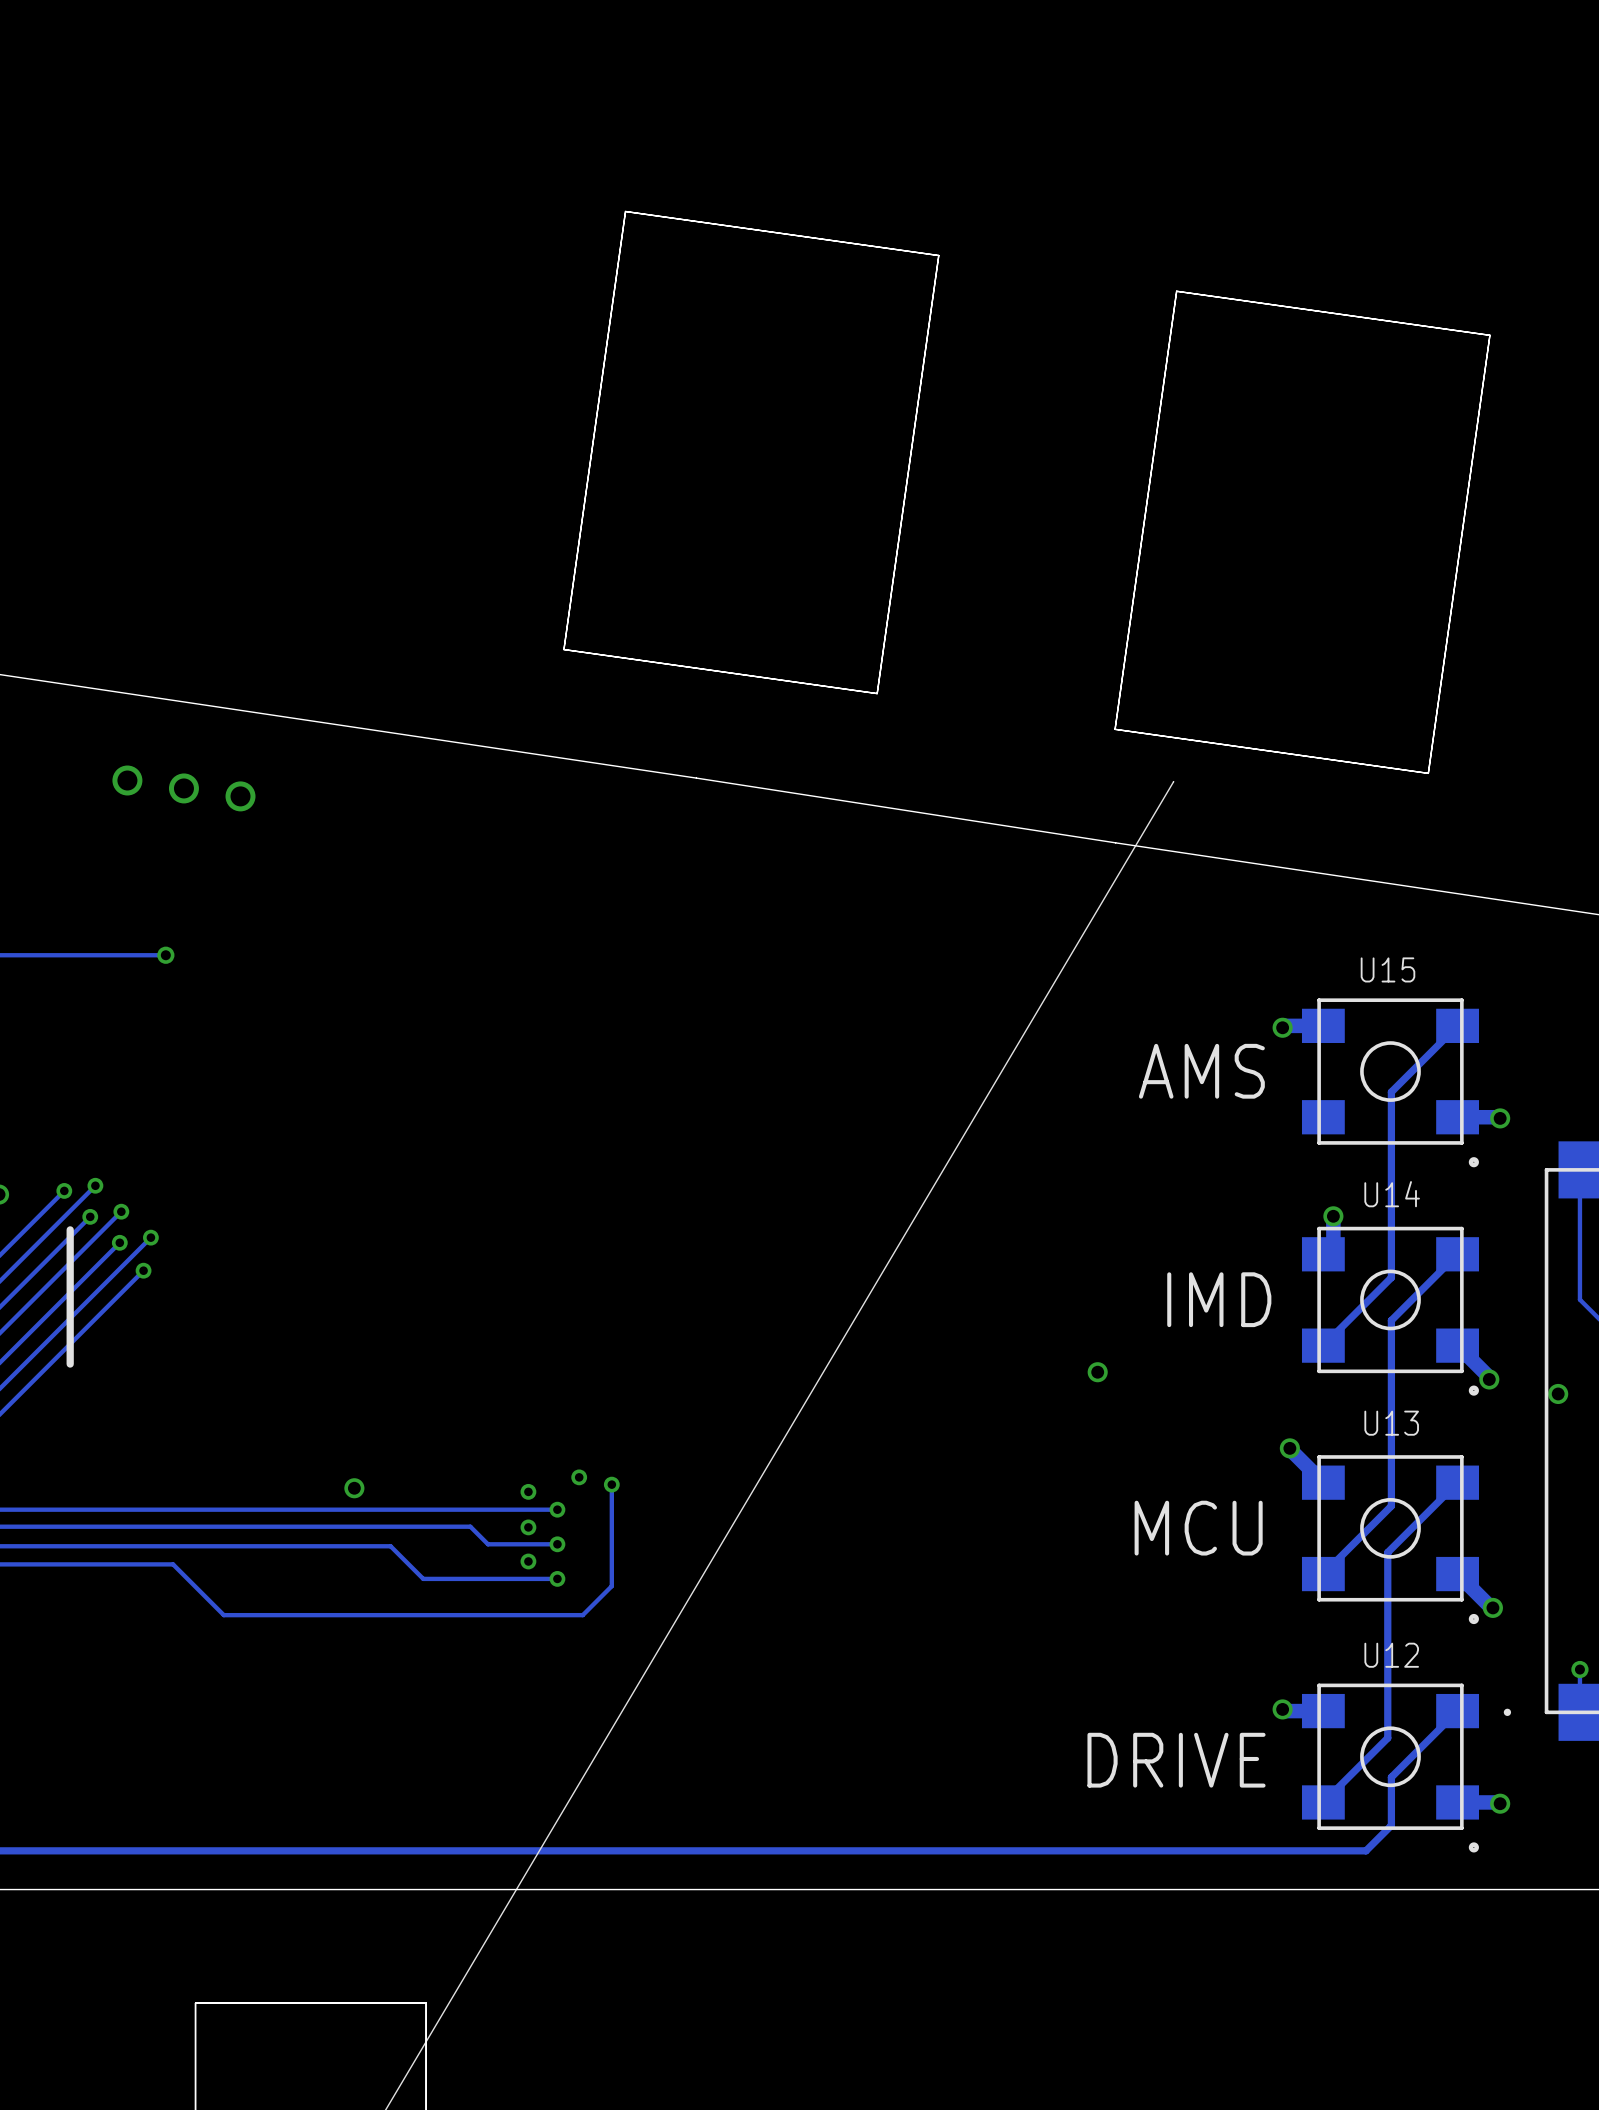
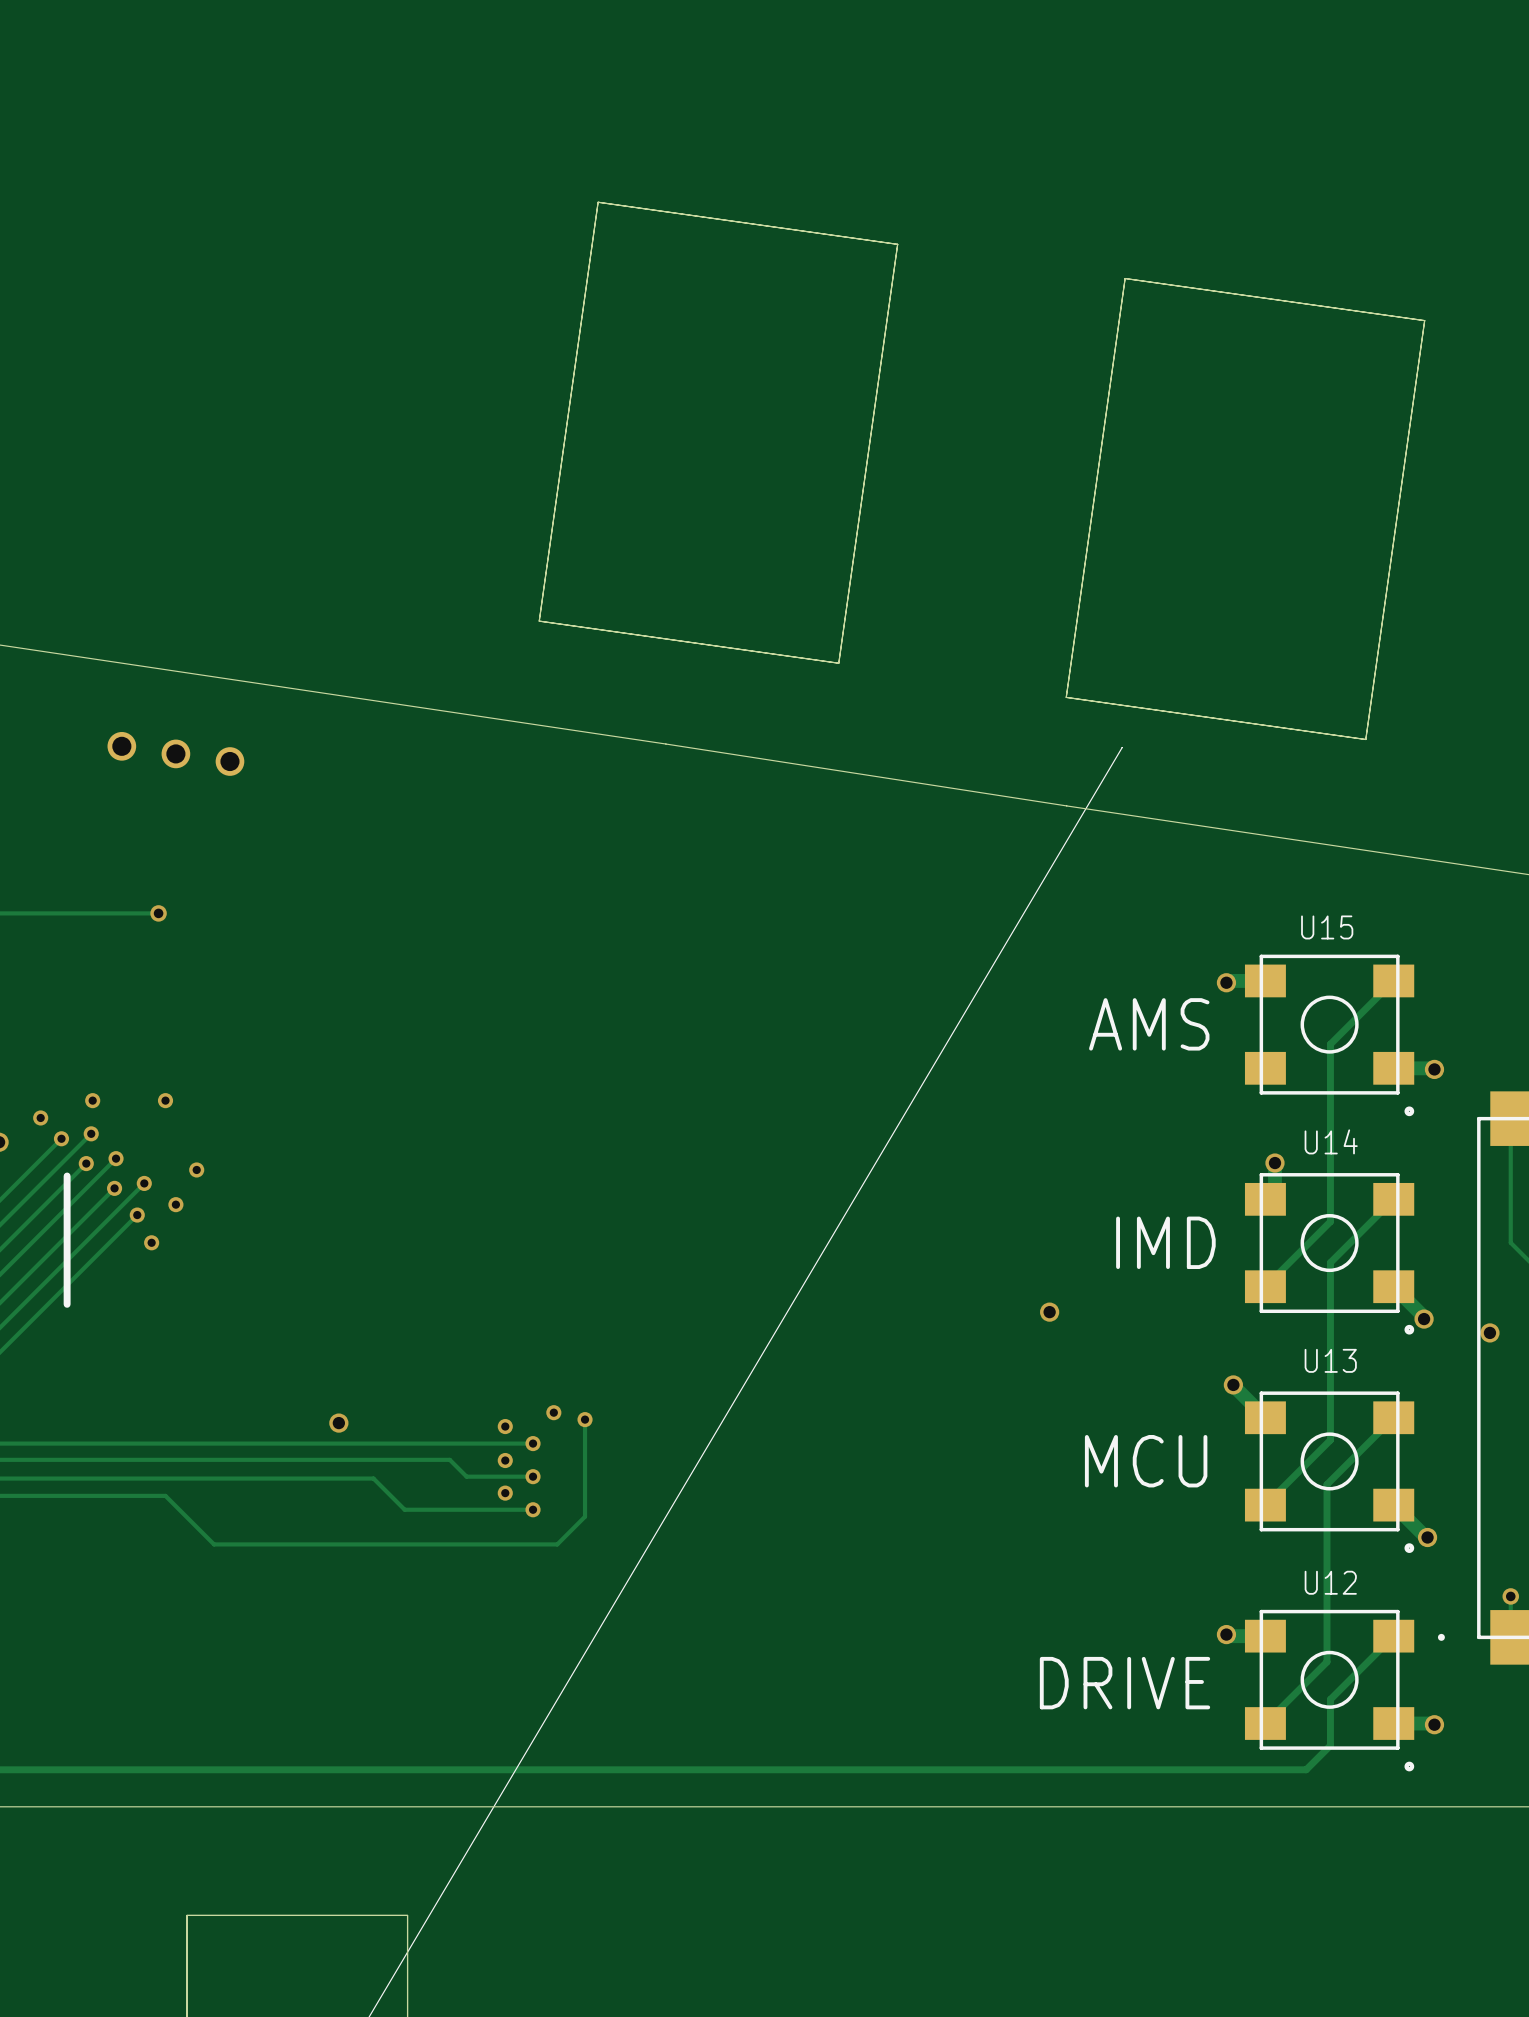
via: none -> (92, 1100)
via: none -> (165, 1100)
via: none -> (40, 1117)
via: none -> (196, 1169)
via: none -> (175, 1204)
via: none -> (151, 1242)

